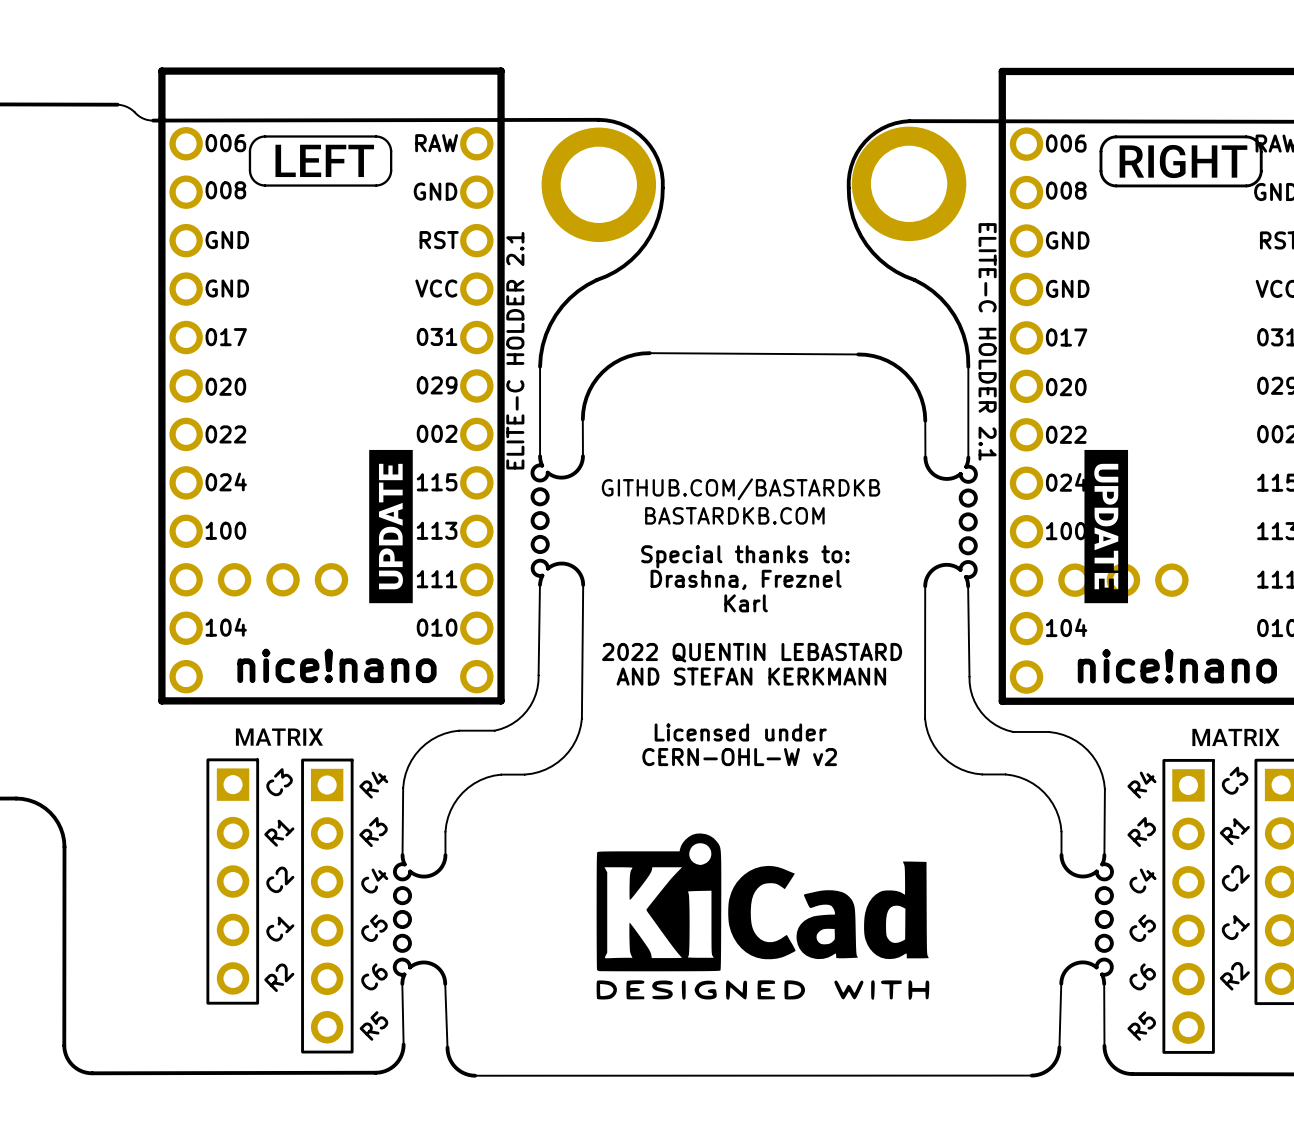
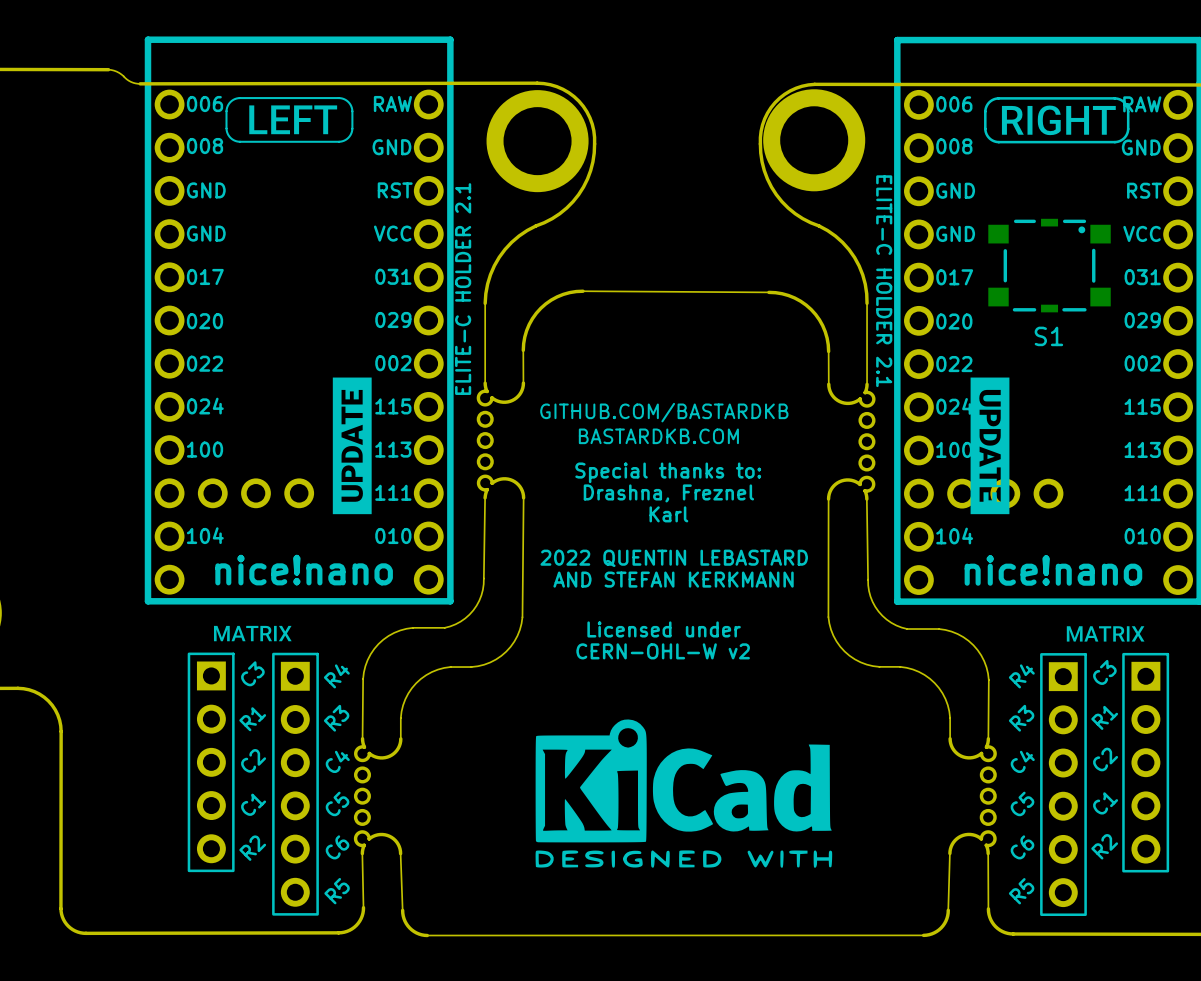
S1: none -> (1049, 265)

